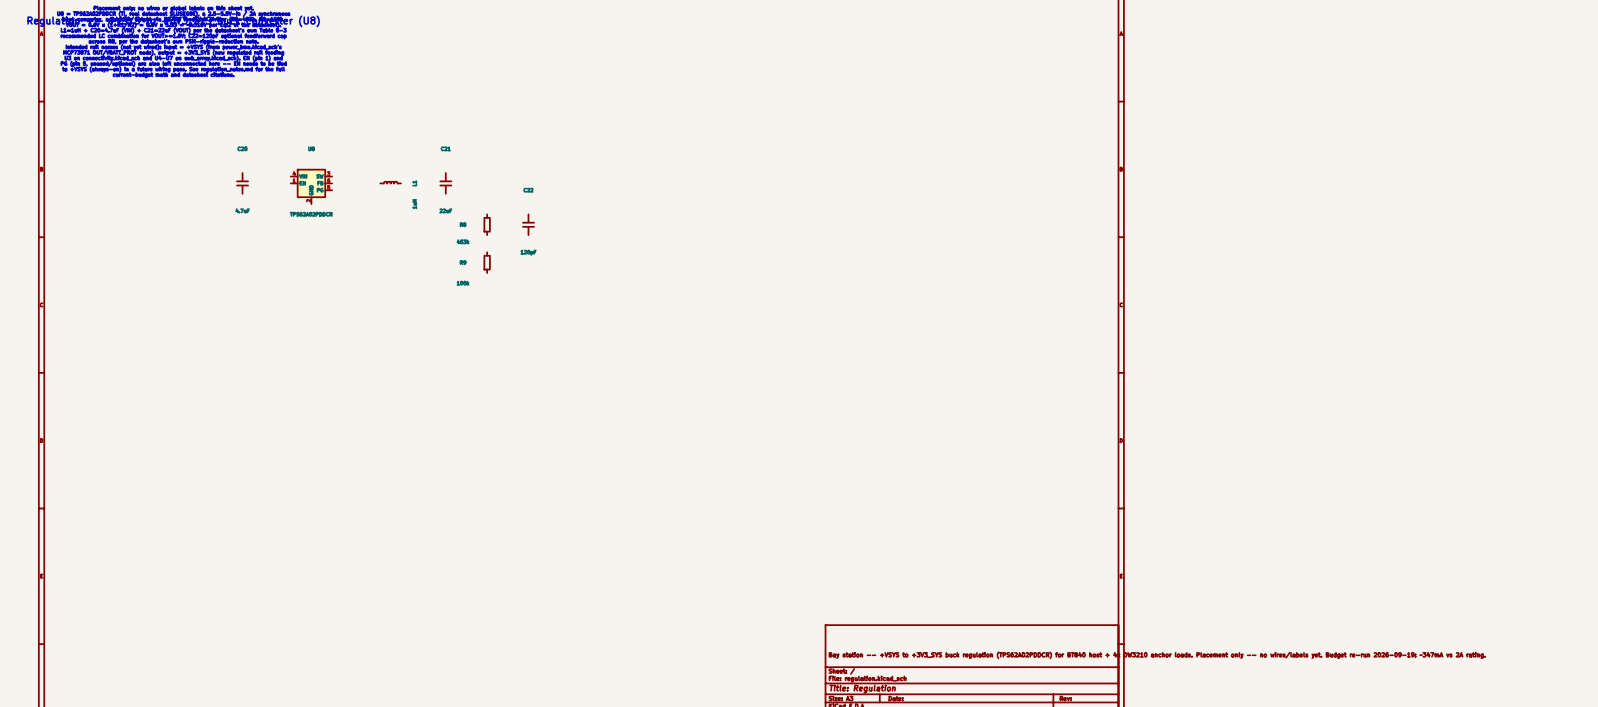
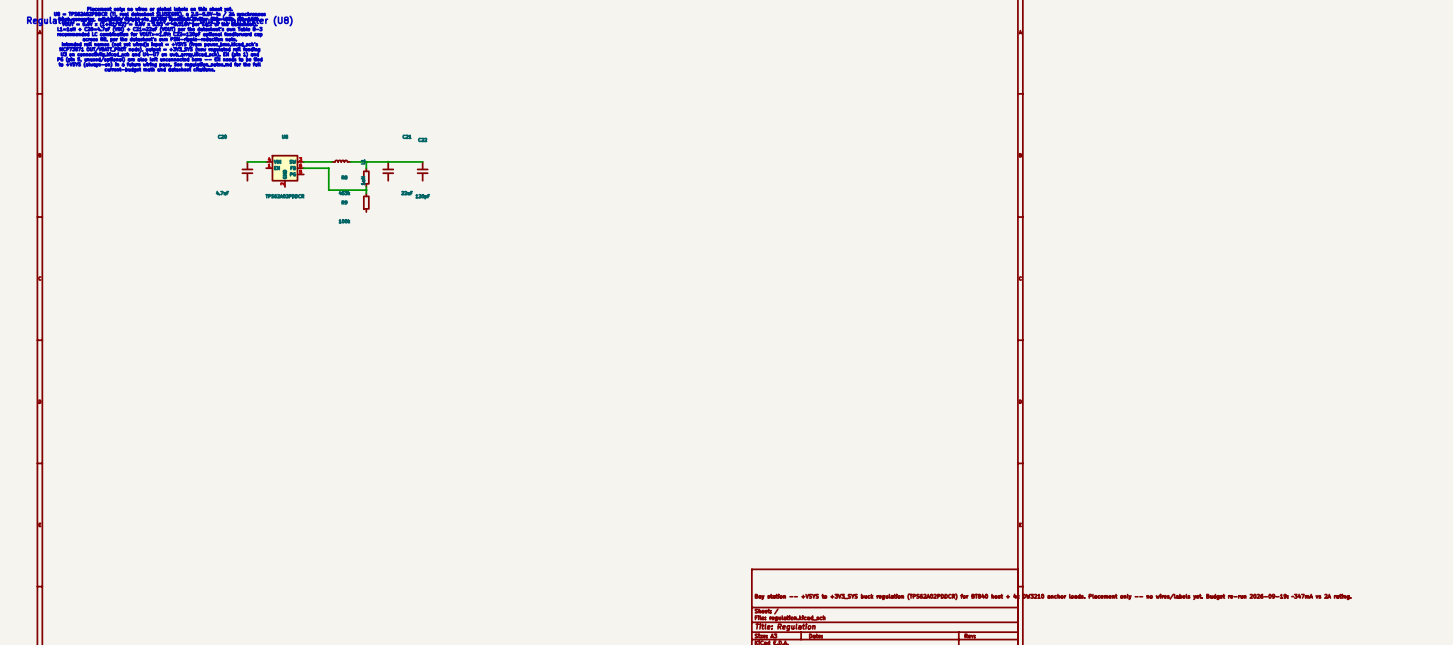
wire: none -> (247, 161) (266, 161)
wire: none -> (303, 161) (331, 161)
wire: none -> (350, 161) (422, 161)
wire: none -> (366, 161) (366, 168)
part position: (390, 182) -> (341, 161)
part position: (242, 183) -> (247, 171)
wire: none -> (303, 168) (328, 168) (328, 190) (366, 190)
part position: (445, 183) -> (388, 171)
wire: none -> (366, 186) (366, 193)
part position: (487, 224) -> (366, 177)
part position: (528, 224) -> (422, 171)
part position: (487, 262) -> (366, 202)

